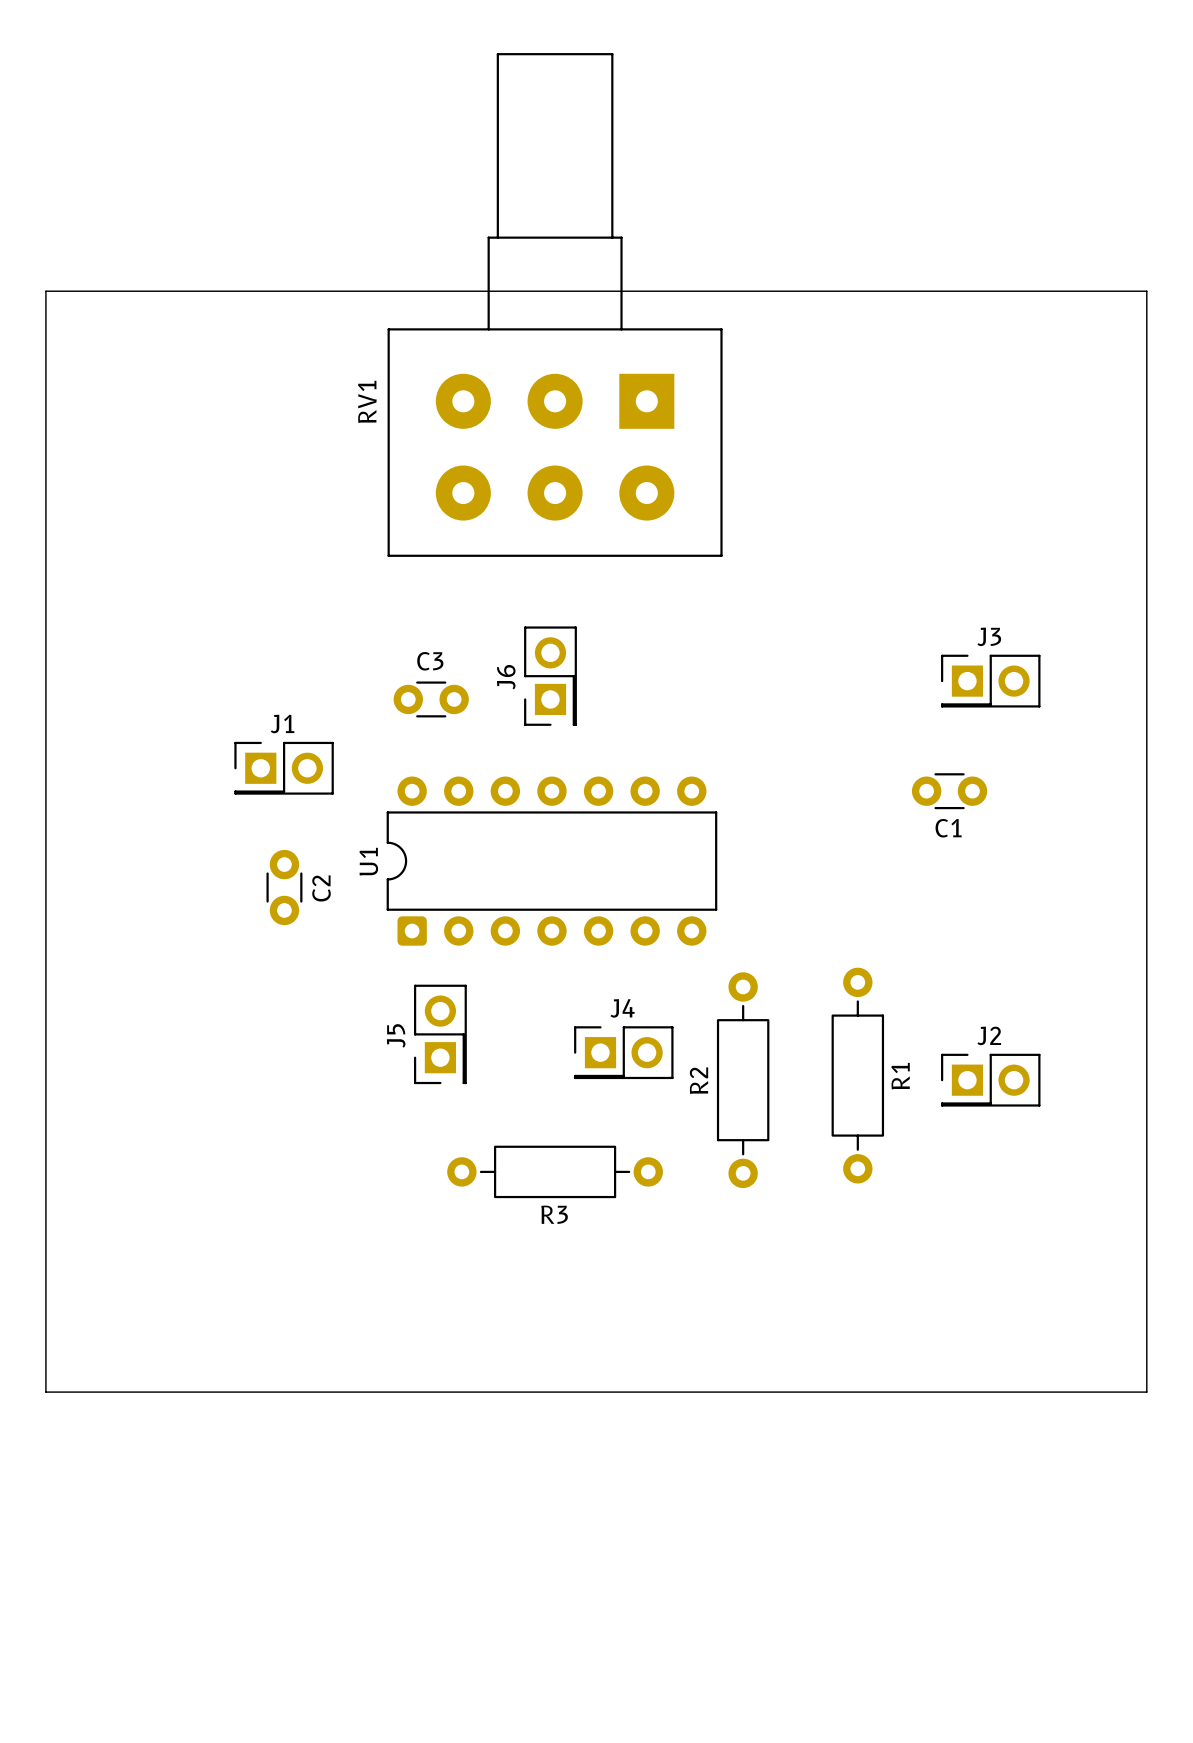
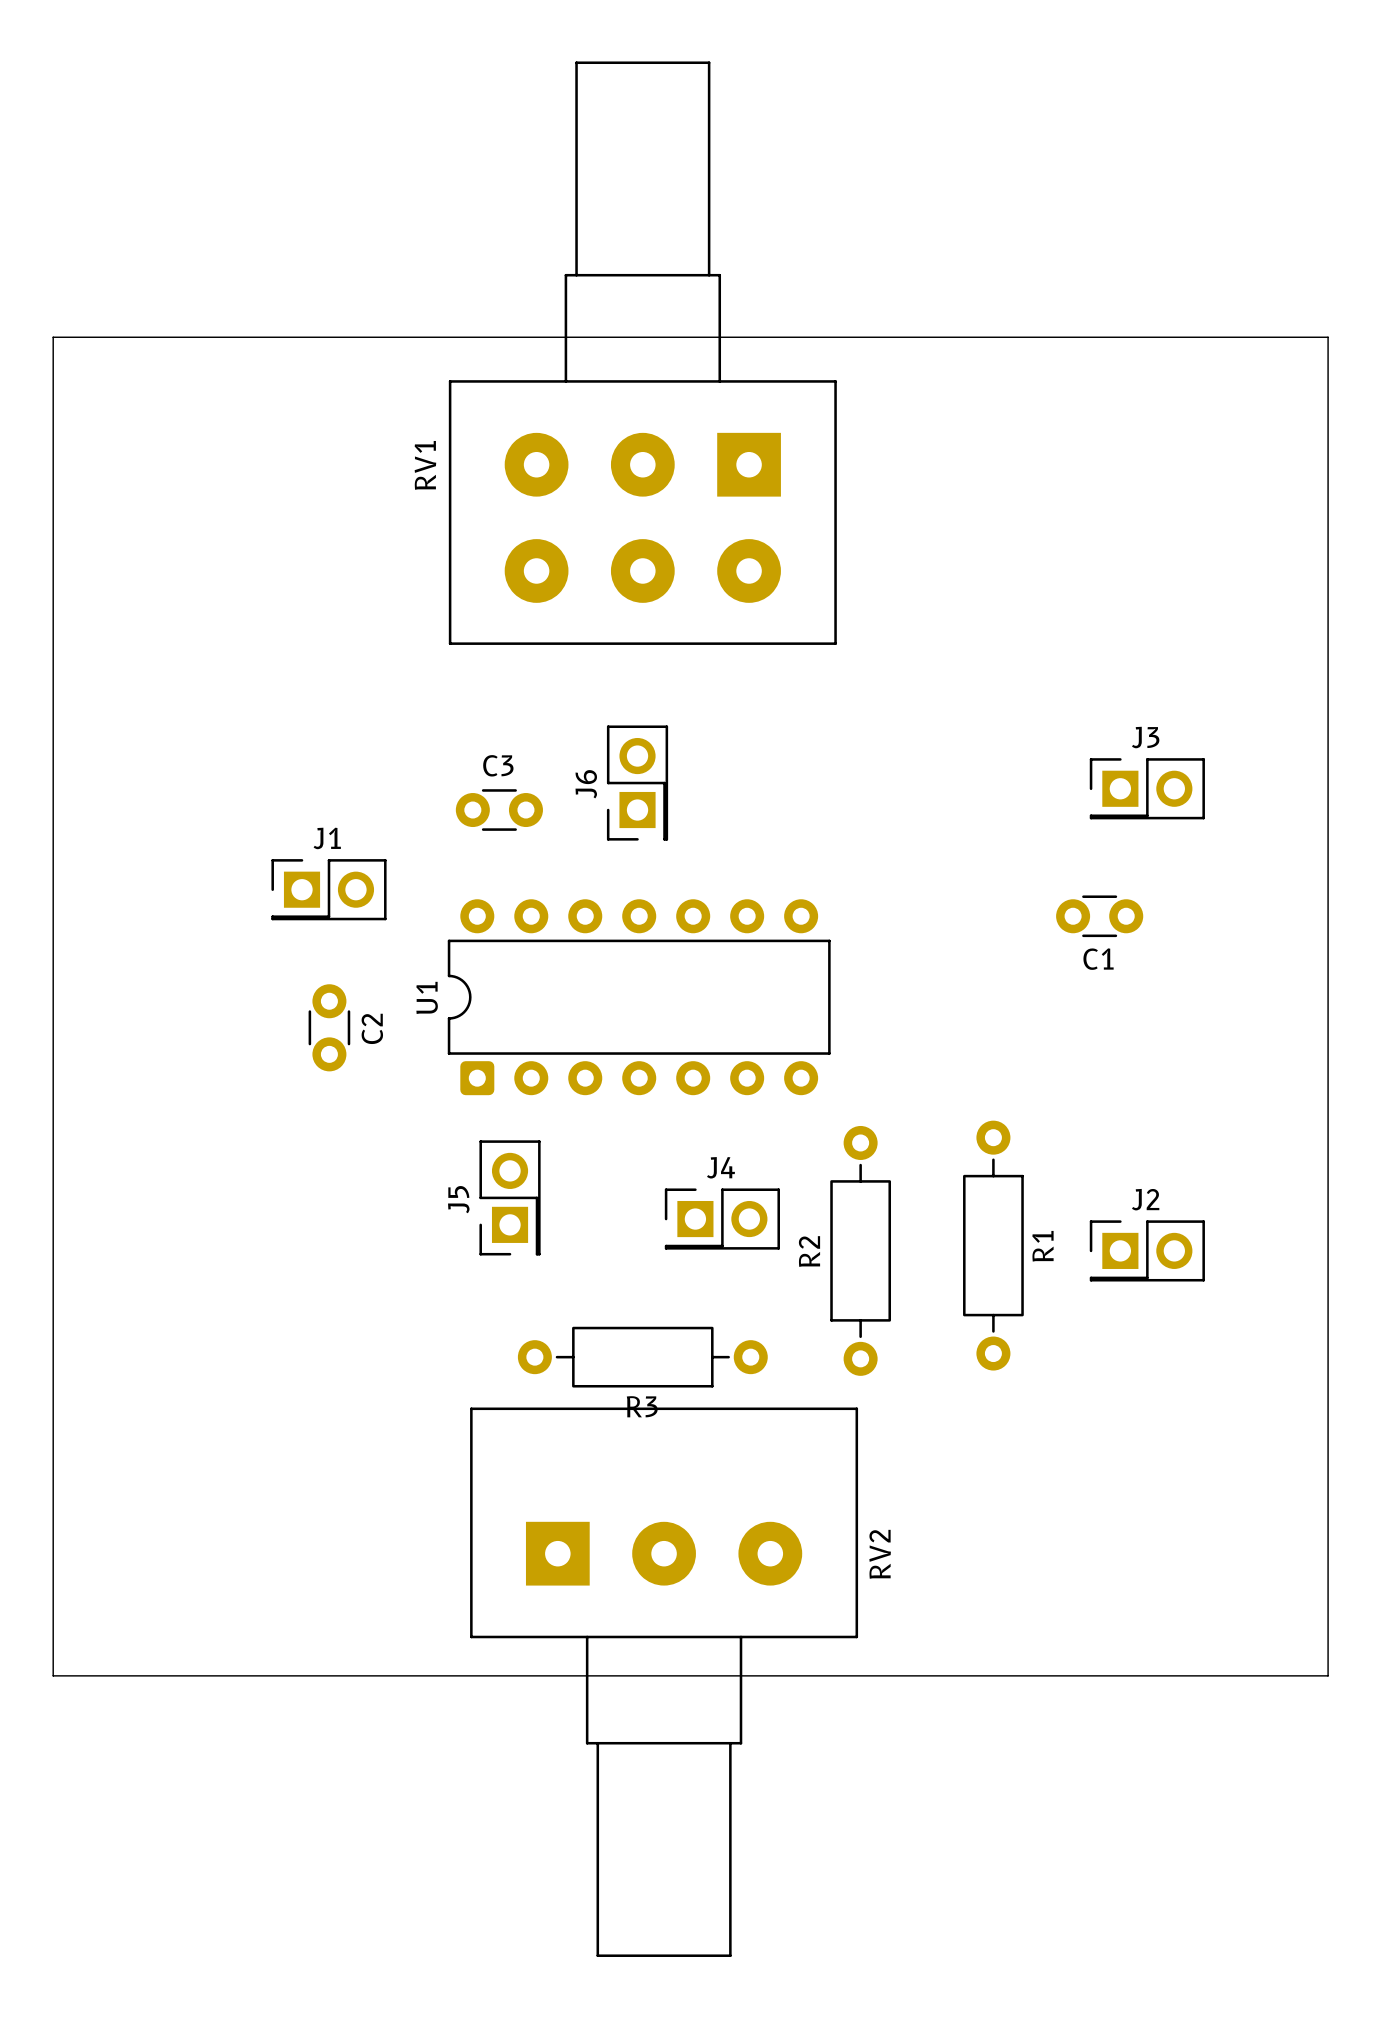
board edge: (45, 1392) (1146, 1392) -> (53, 1612) (53, 1675) (1328, 1675) (1328, 1612)
RV2: none -> (664, 1682)

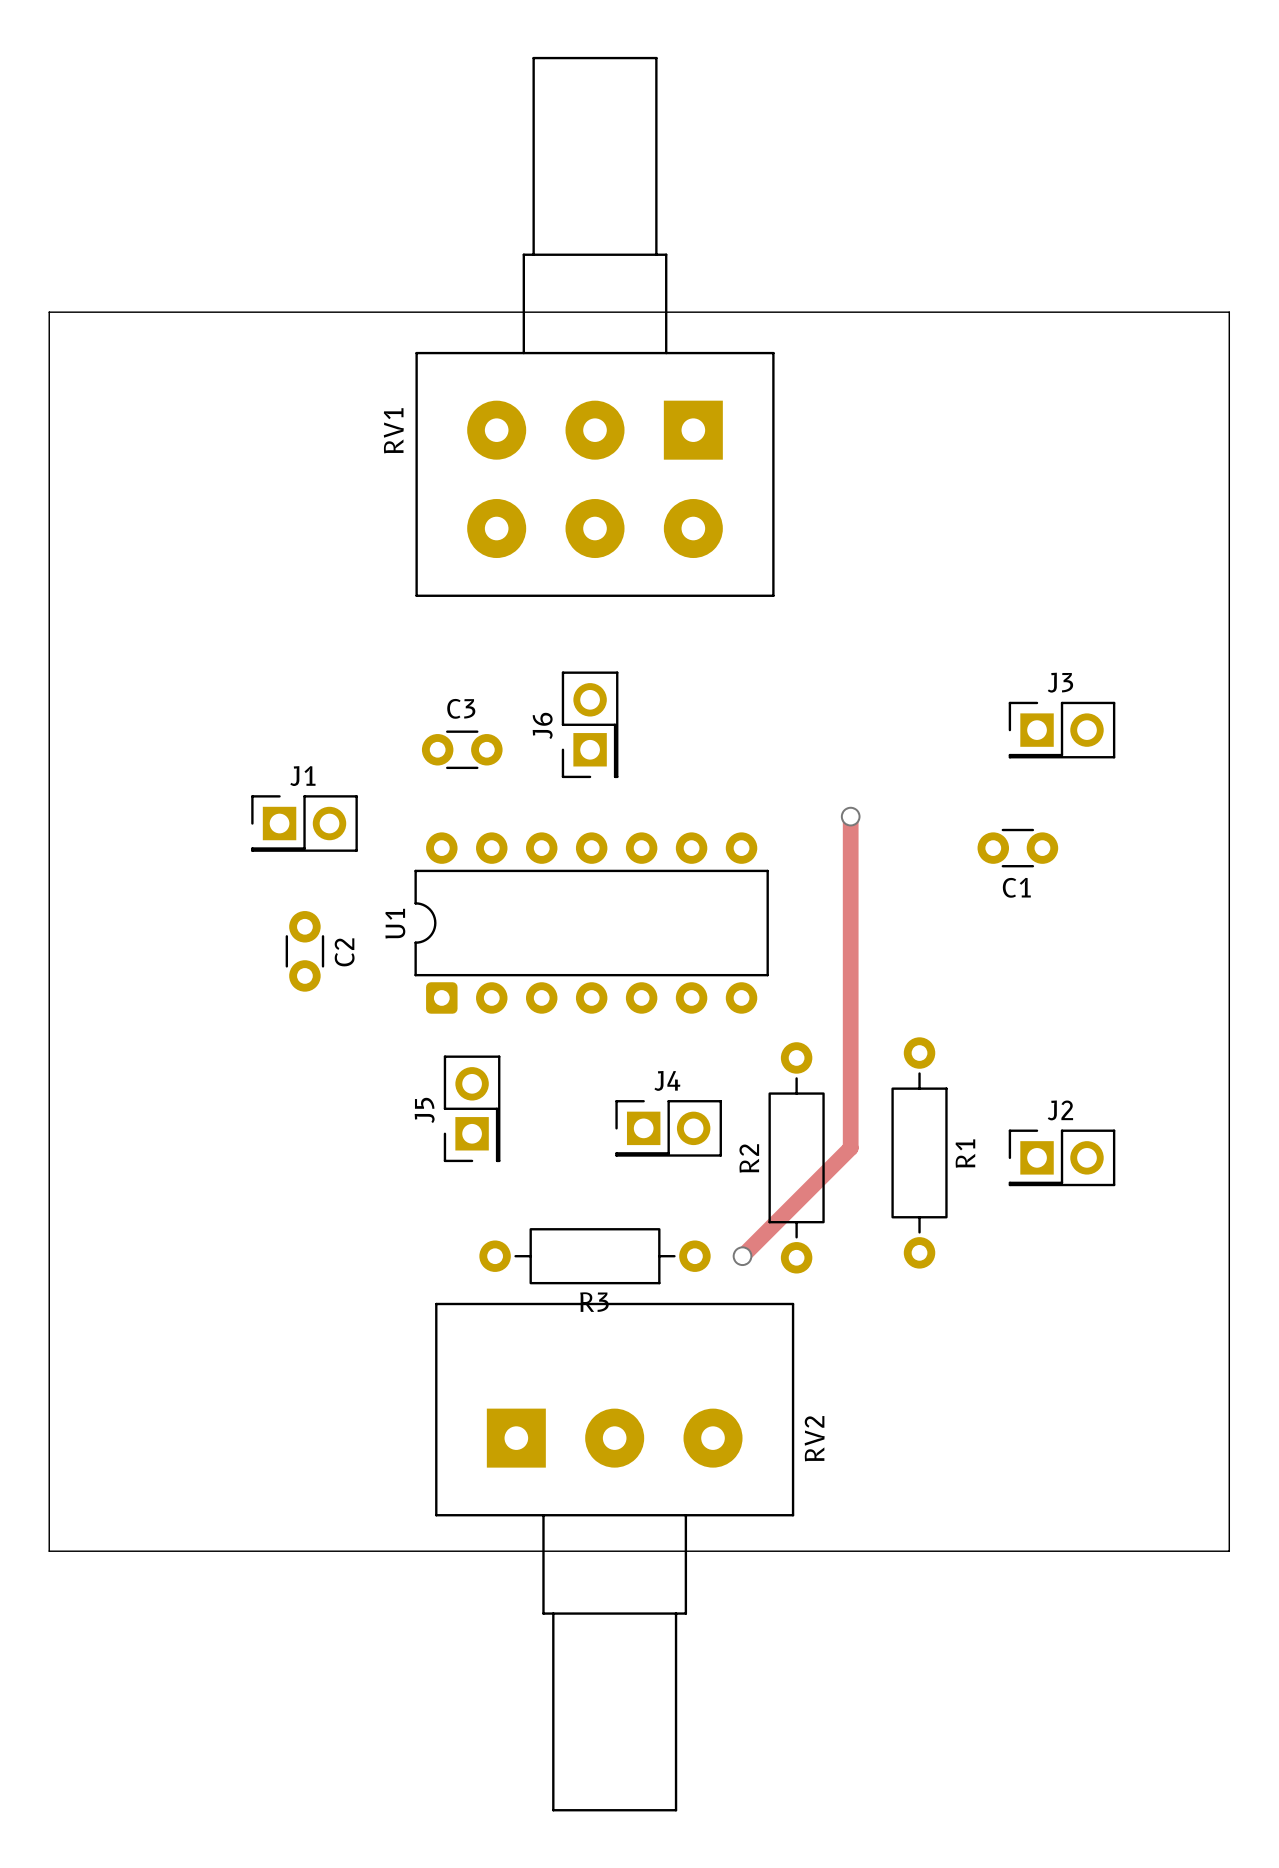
track: none -> (850, 816) (850, 1148) (742, 1256)
via: none -> (850, 816)
via: none -> (742, 1256)

